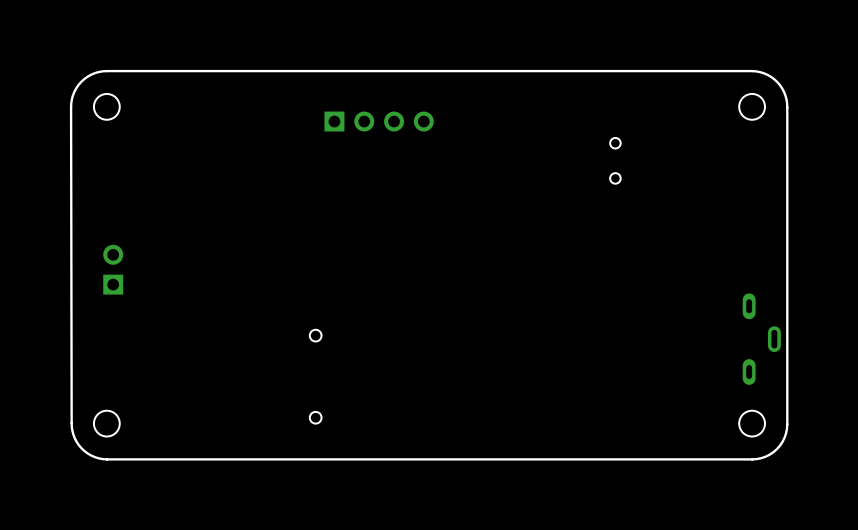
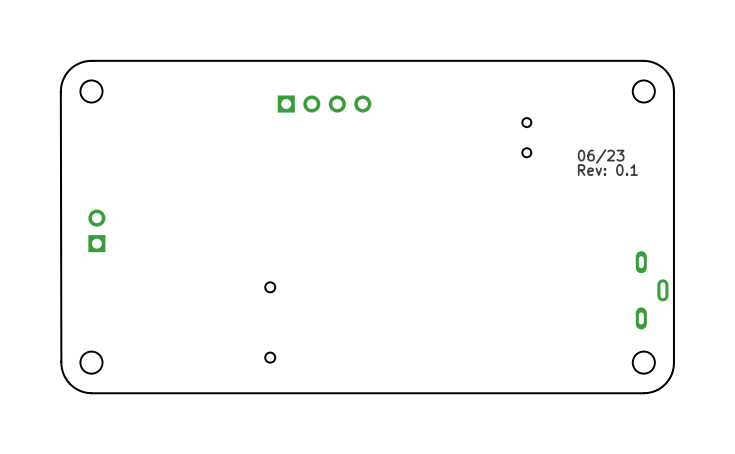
text: none -> 06/23 (601, 156)
text: none -> Rev: 0.1 (607, 170)

